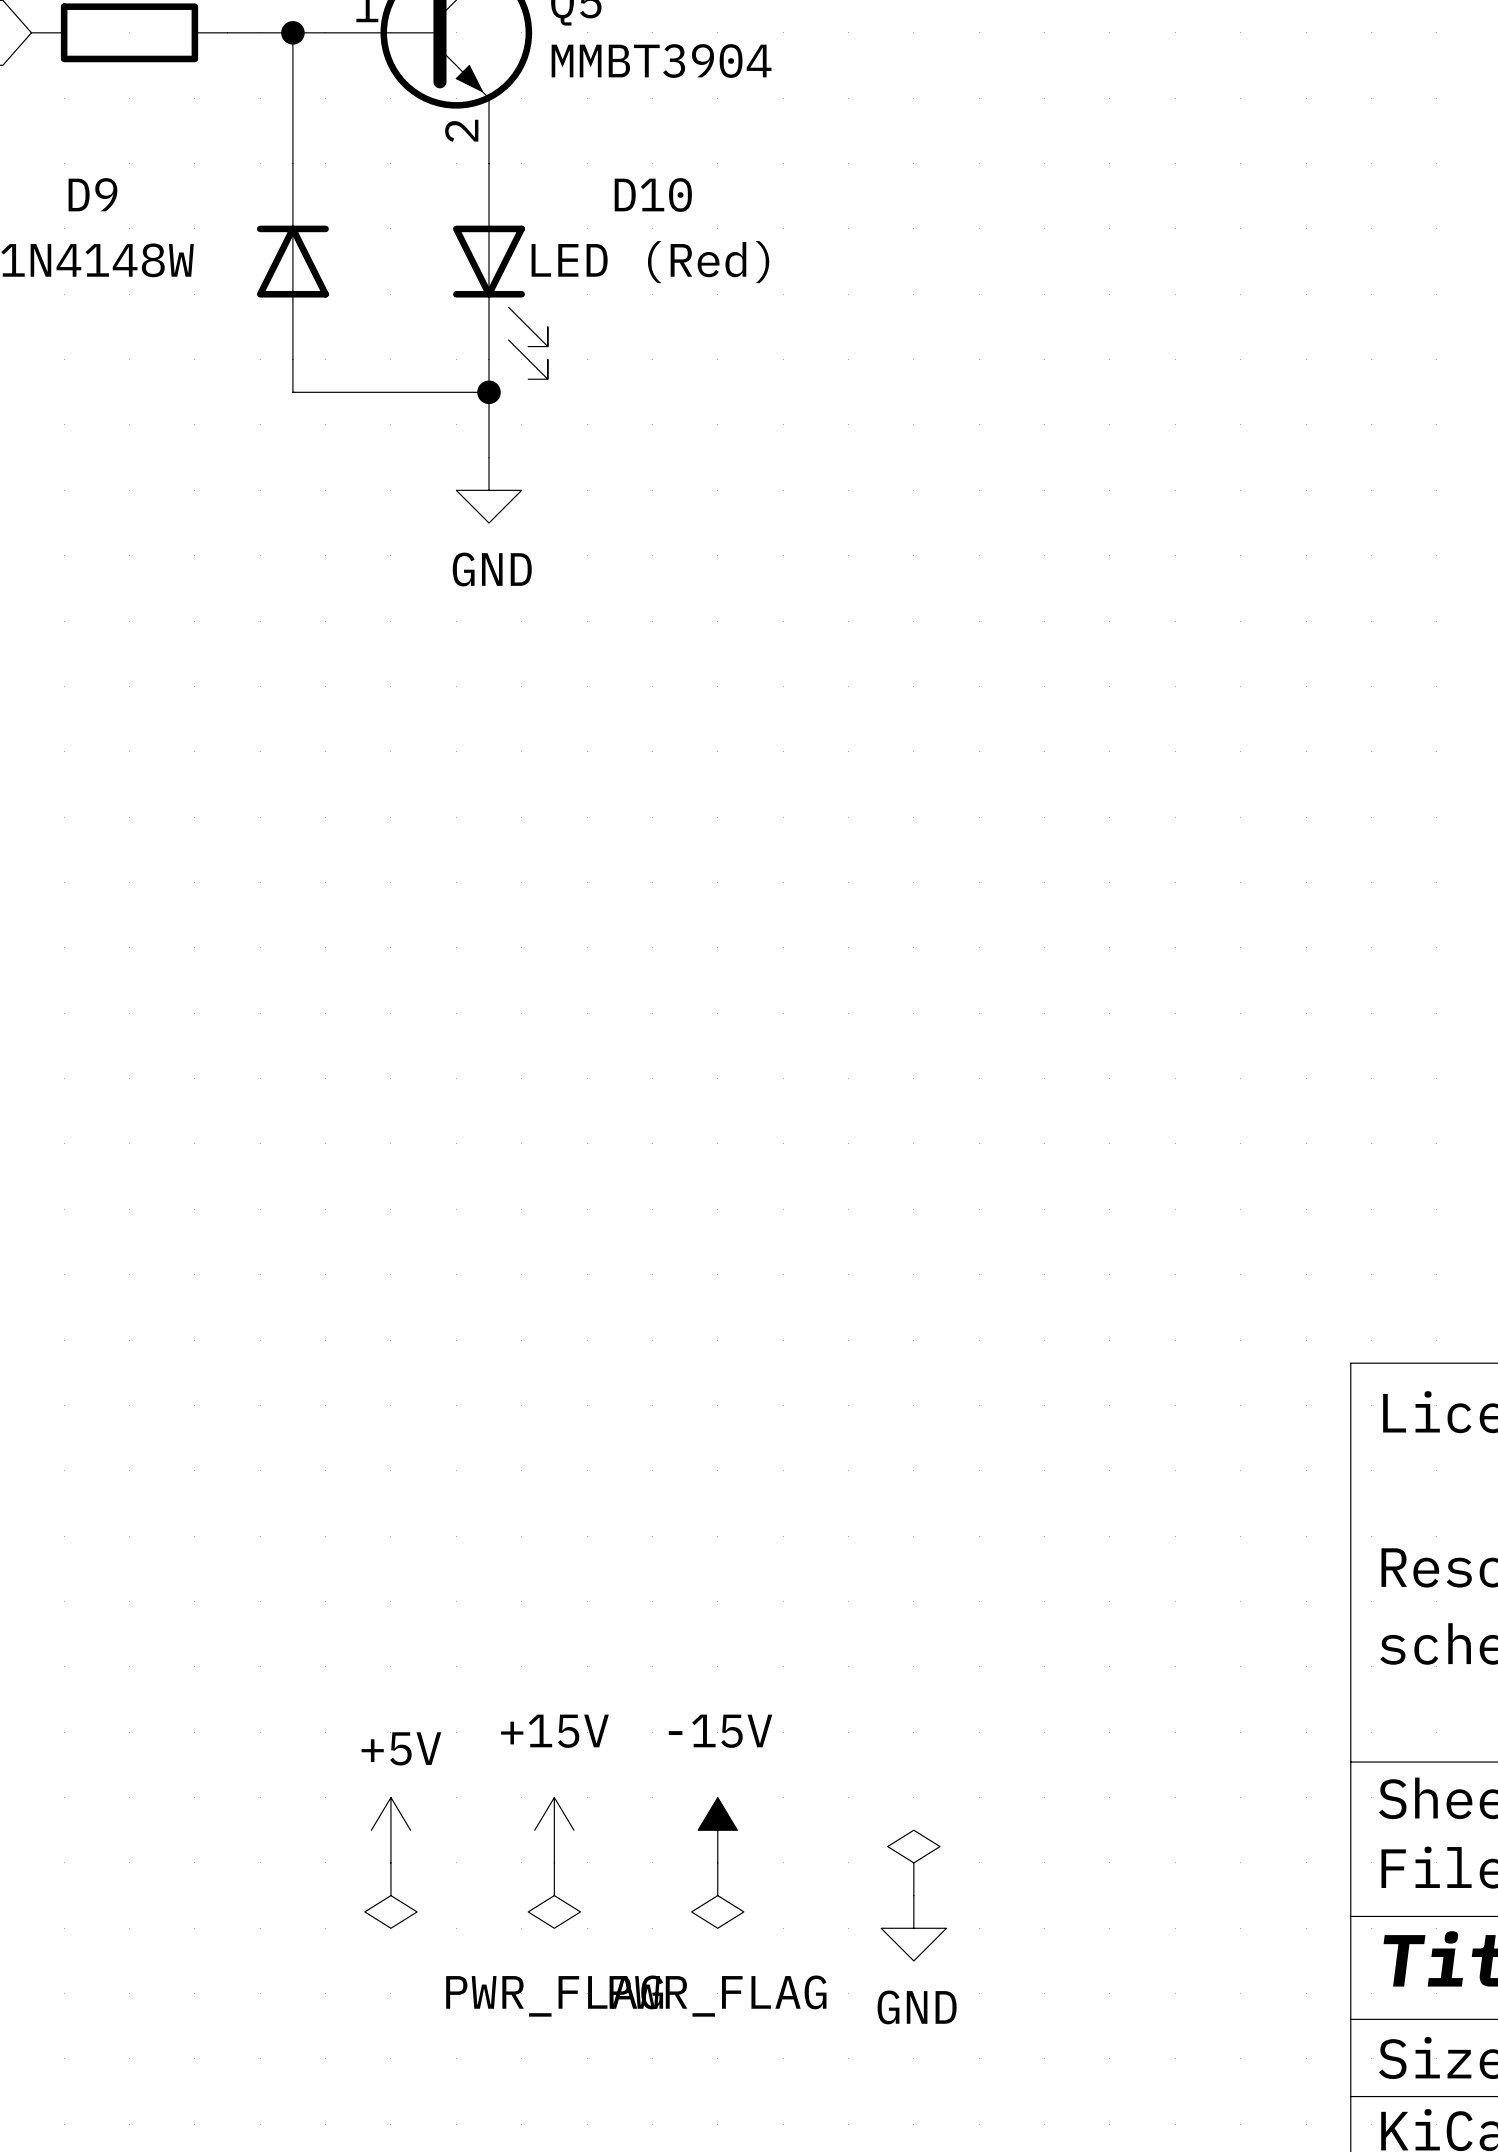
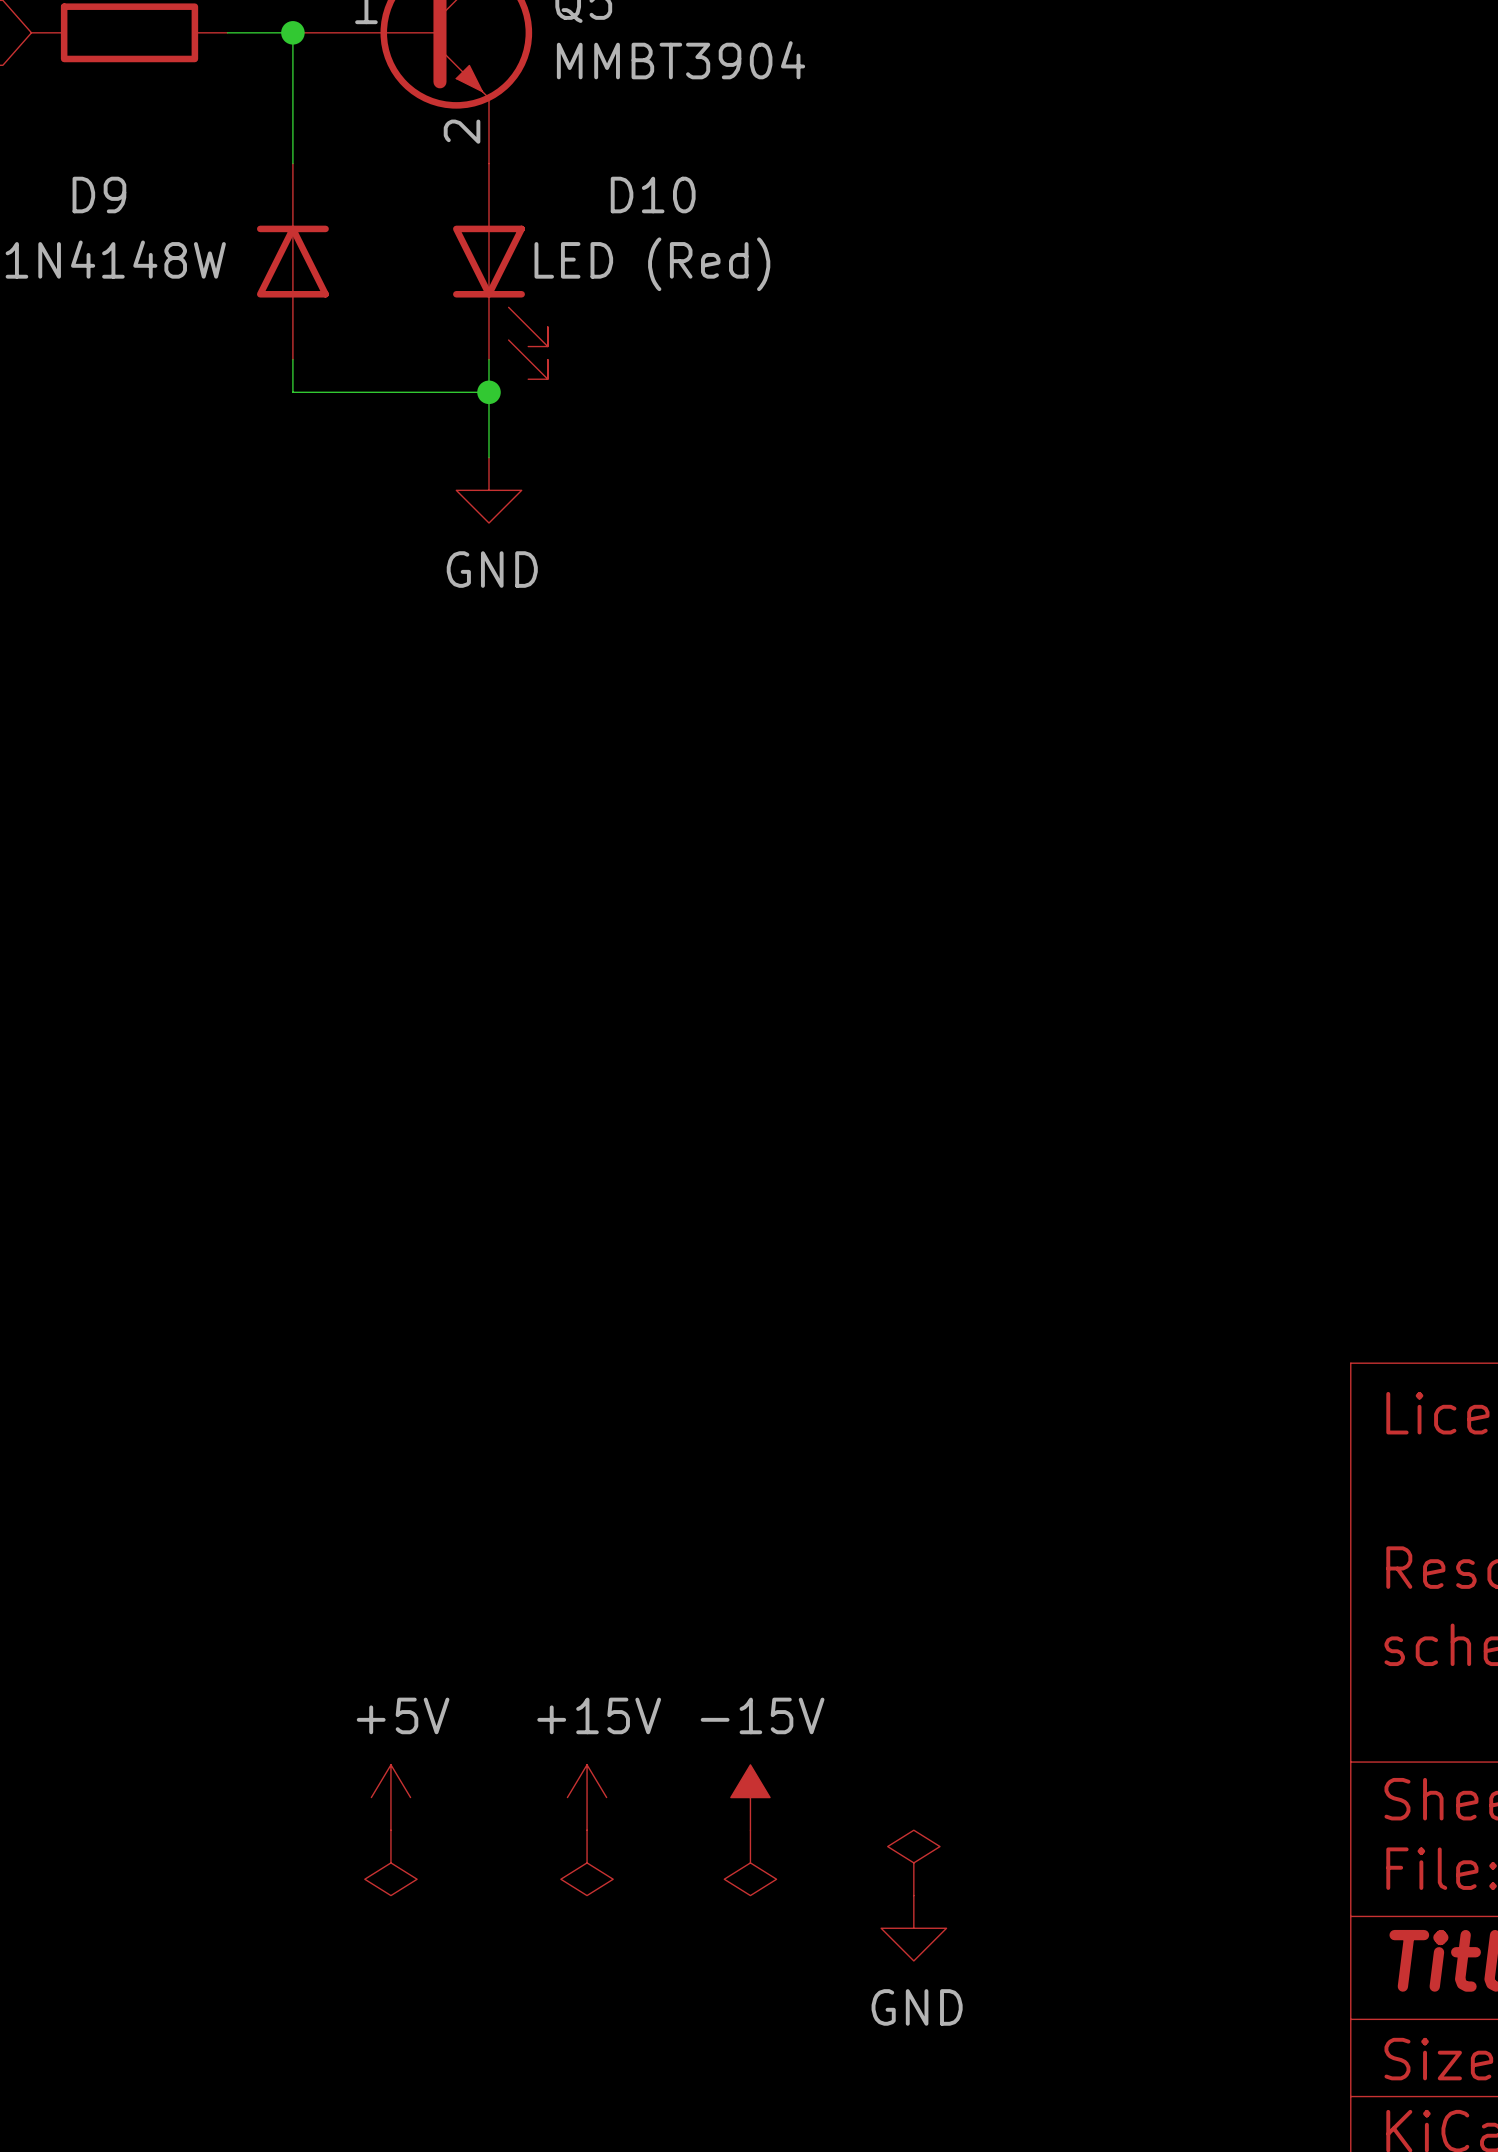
power symbol text position: +15V (554, 1731) -> +15V (599, 1715)
power symbol text position: -15V (720, 1731) -> -15V (762, 1715)
power symbol position: +5V (390, 1830) -> +5V (390, 1797)
power symbol position: +15V (554, 1830) -> +15V (587, 1797)
power symbol position: -15V (717, 1830) -> -15V (750, 1797)
power symbol: none -> (587, 1862)
power symbol: none -> (750, 1862)
power symbol position: (390, 1895) -> (390, 1862)
power symbol: PWR_FLAG (554, 1895) -> none
power symbol: PWR_FLAG (717, 1895) -> none

